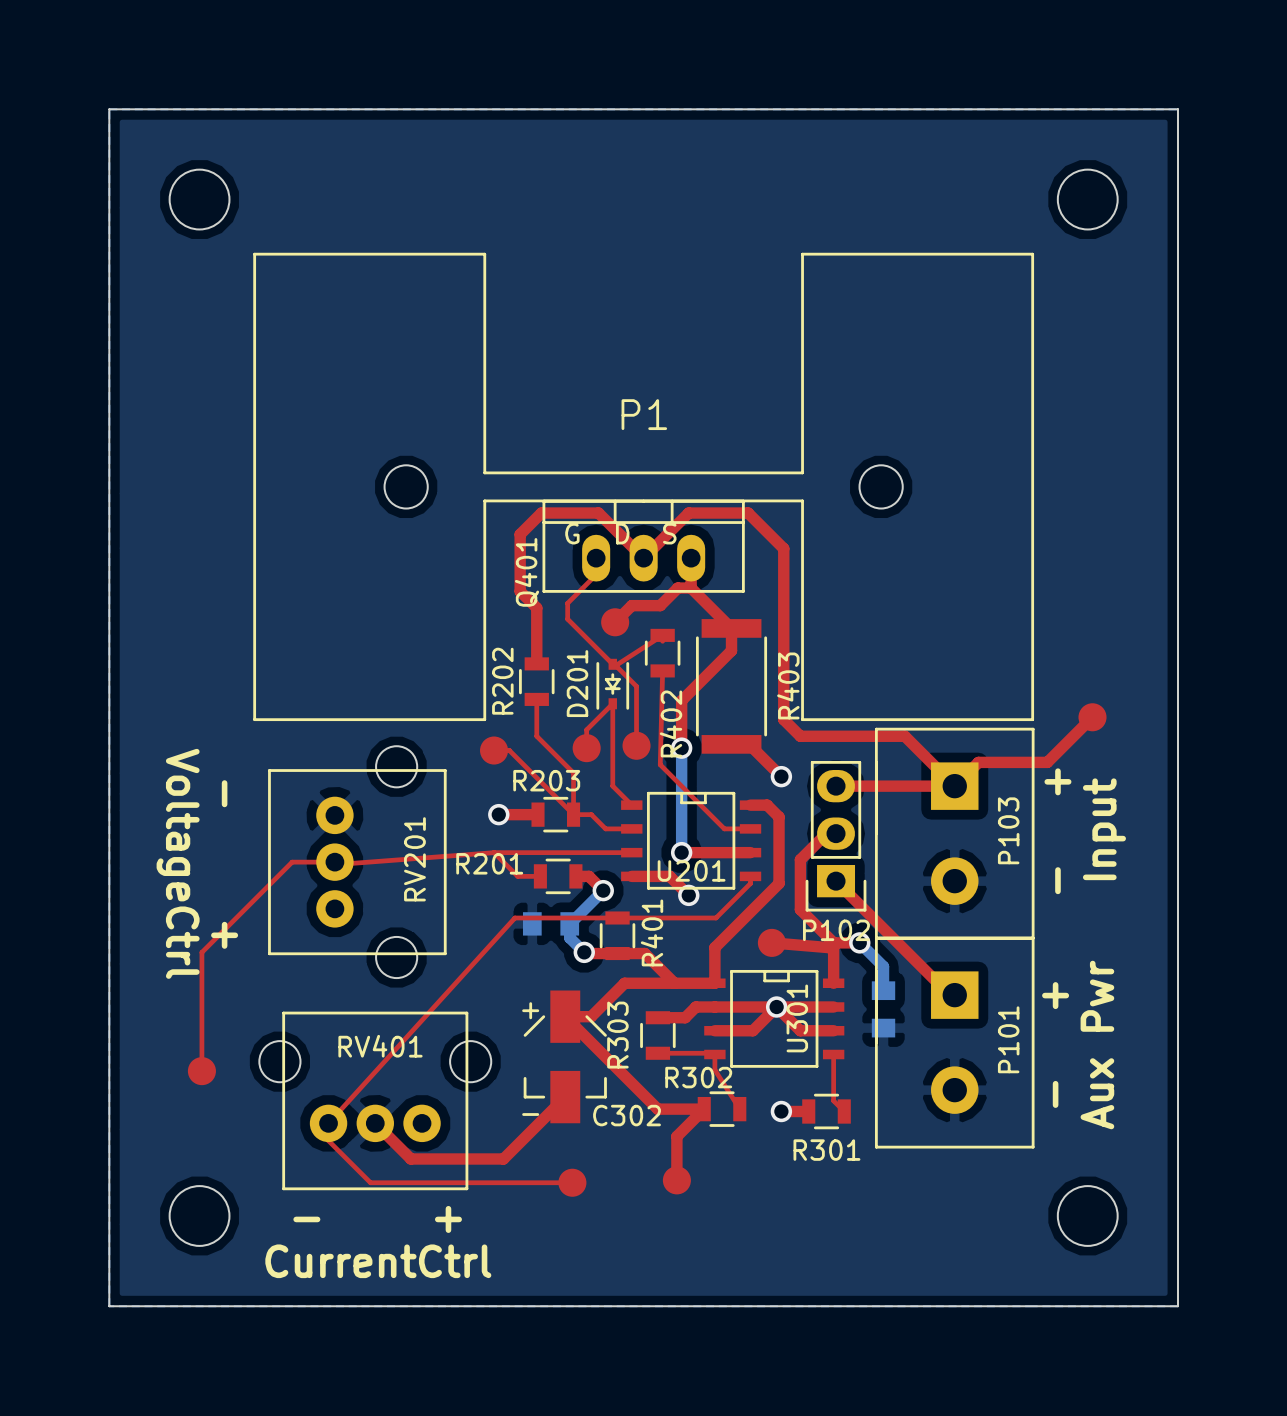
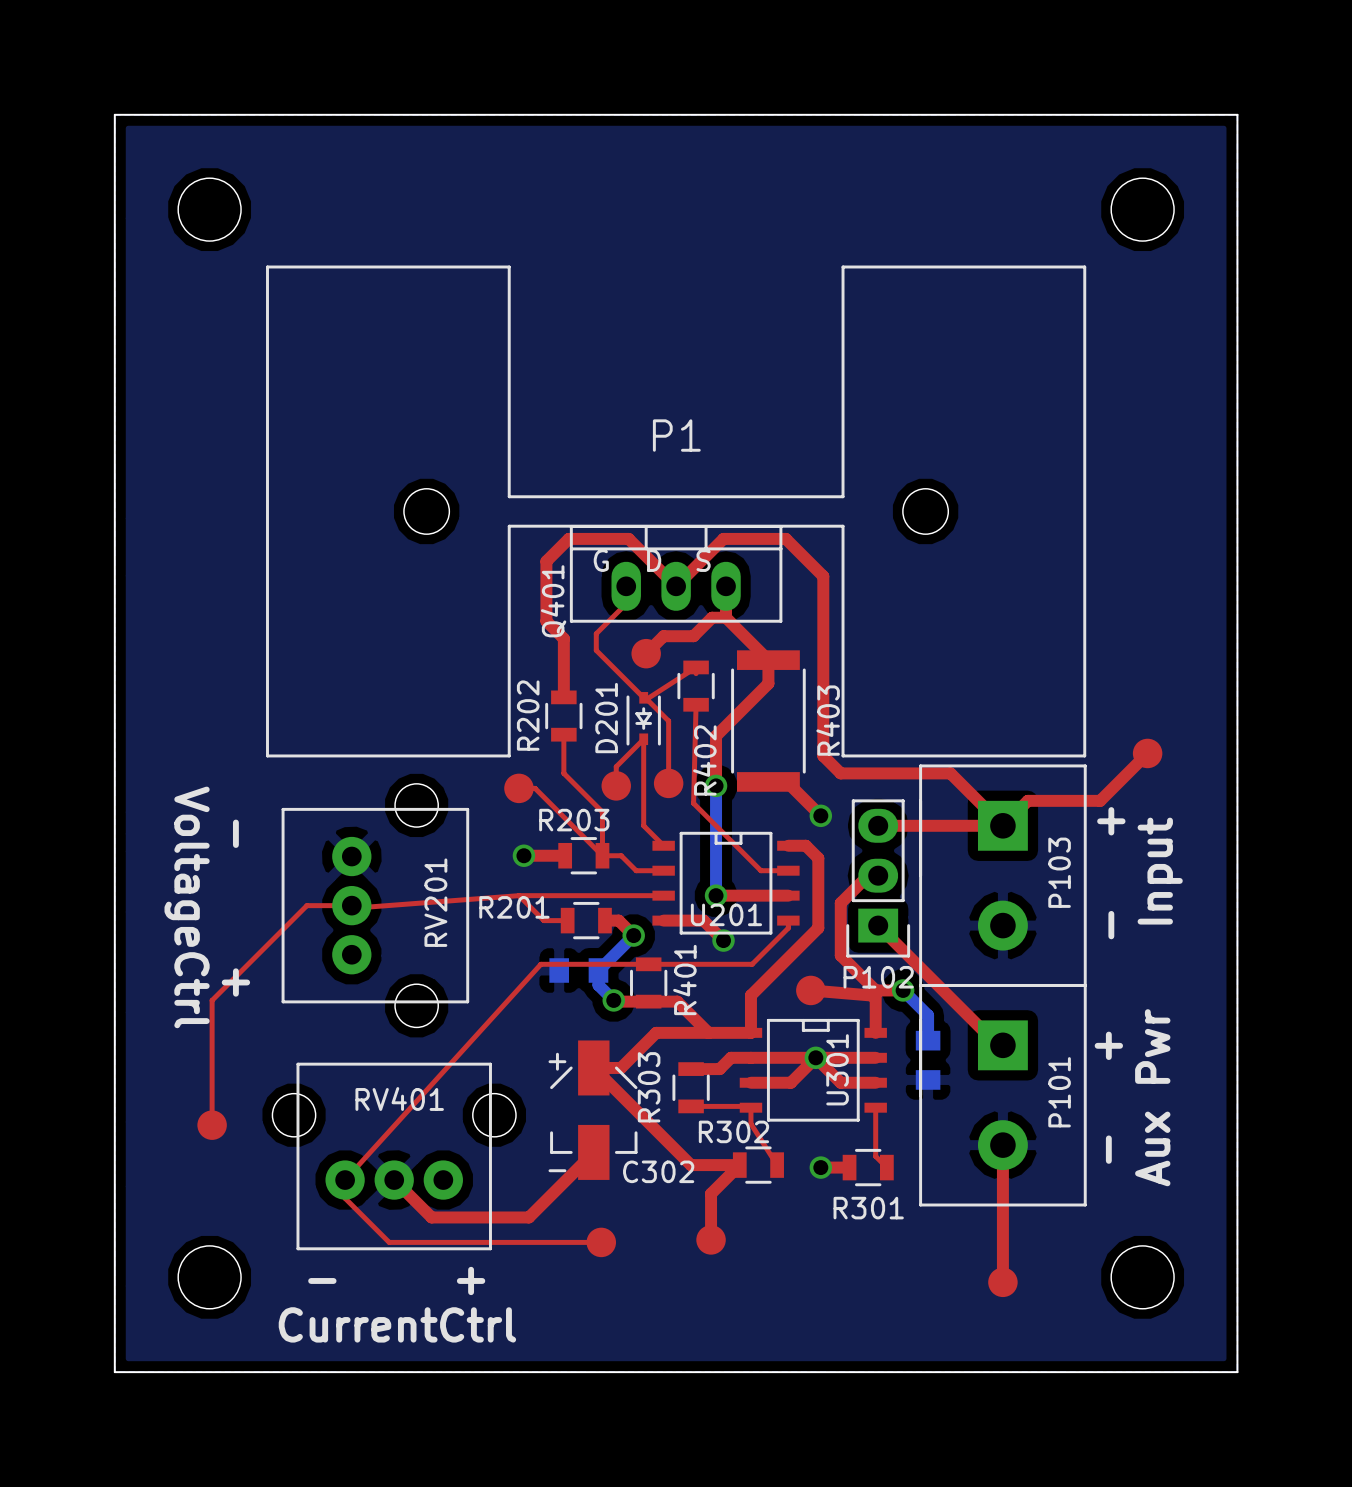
top track: none -> (1002, 1145) (1002, 1282)
part: none -> (1002, 1282)

